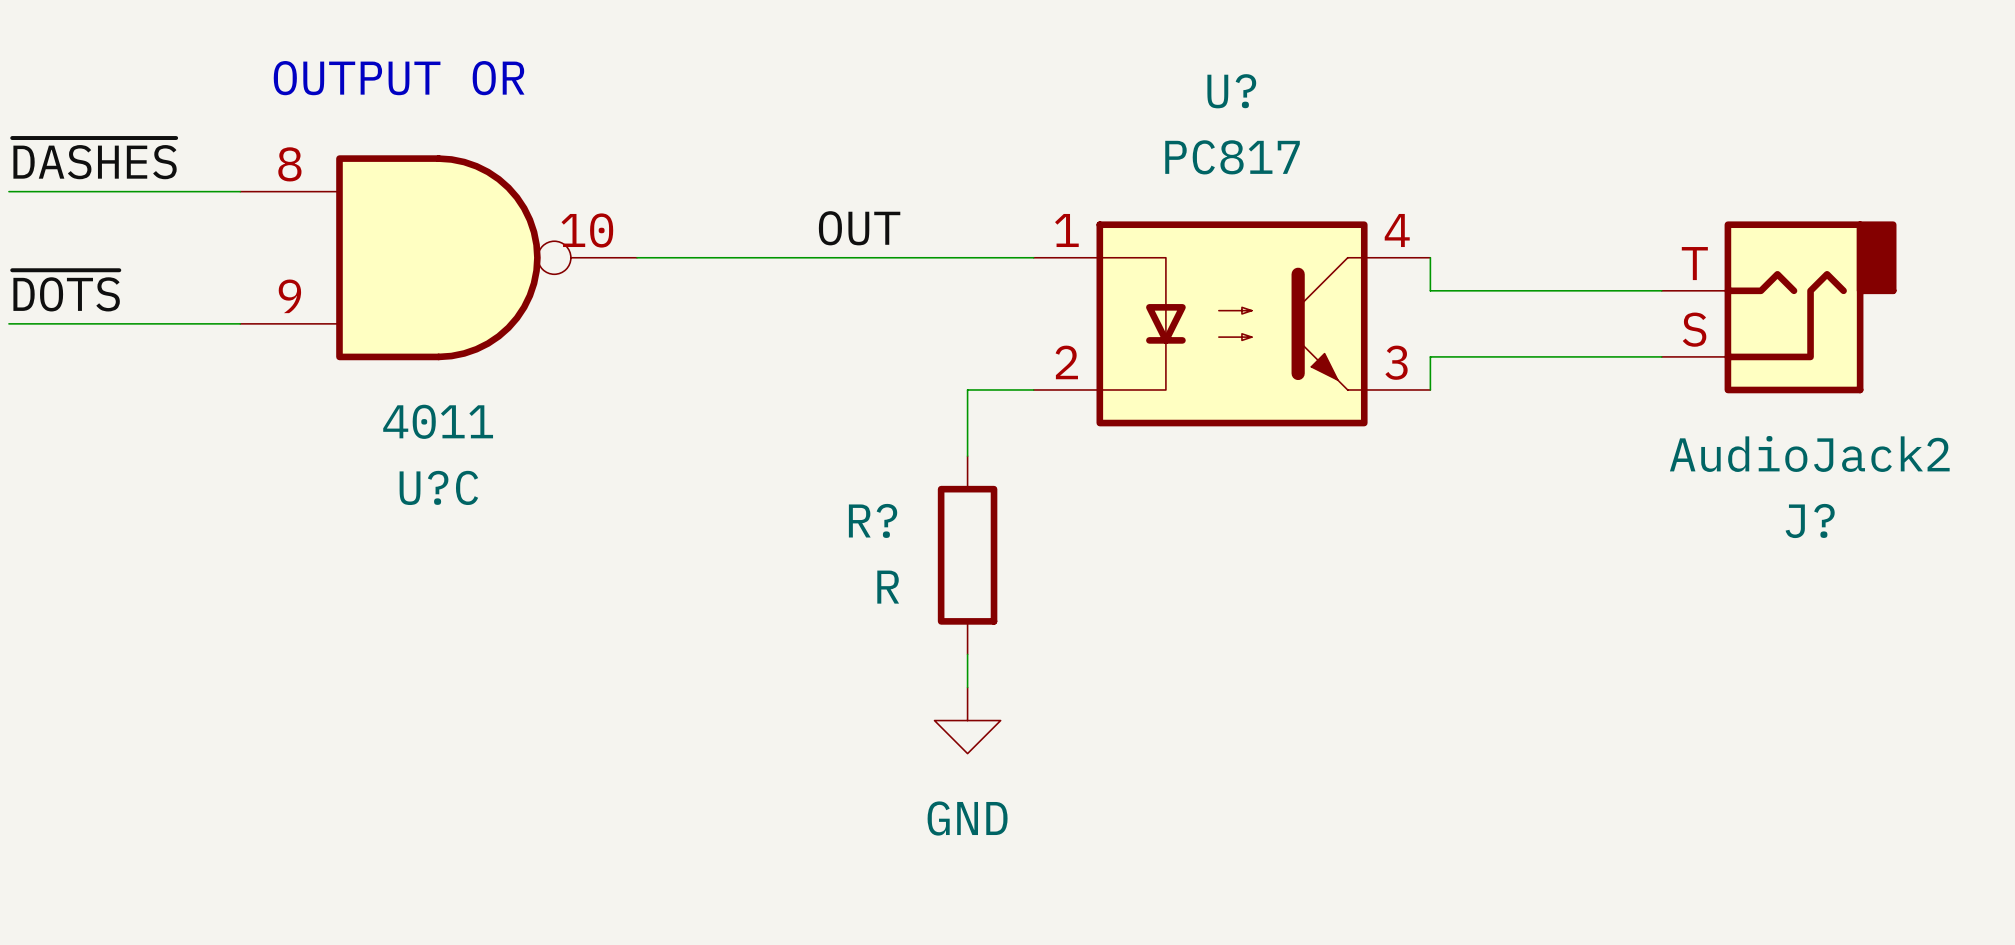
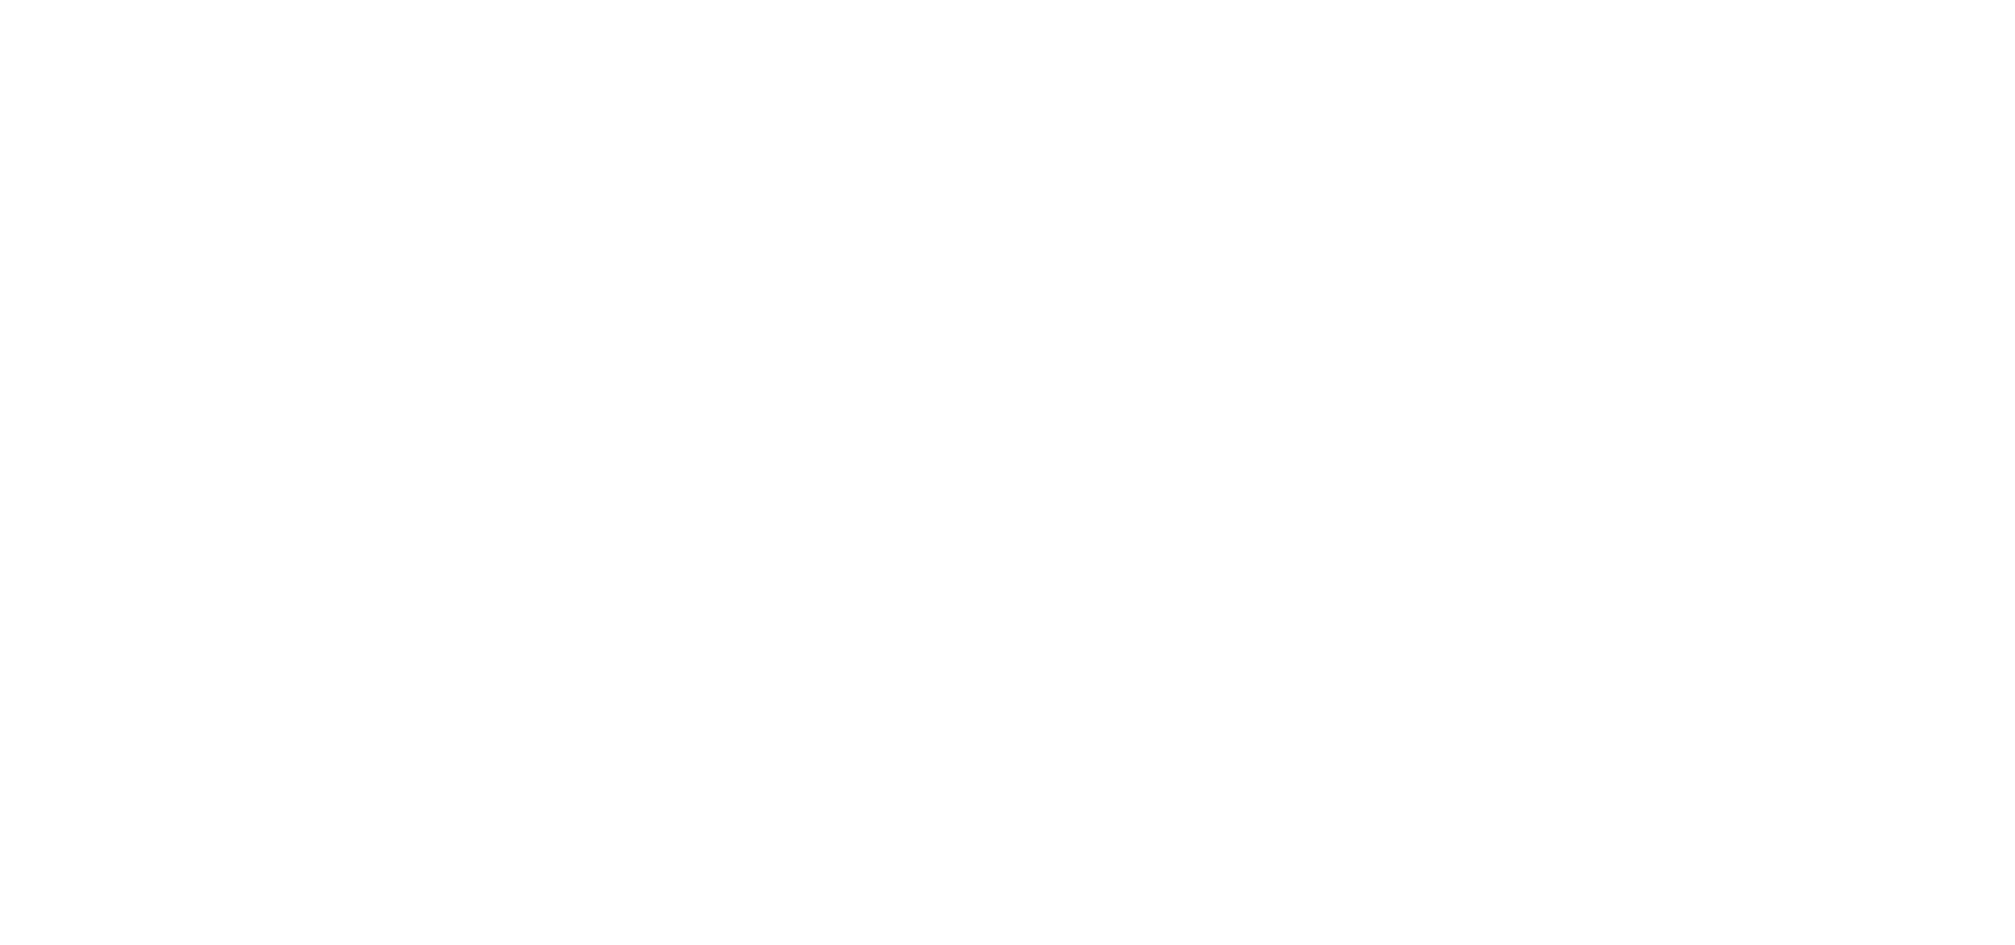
text: OUTPUT OR (399, 78) -> none
label: ~{DASHES} (94, 158) -> none
wire: (8, 191) (240, 191) -> none
label: OUT (859, 228) -> none
U?C: 4011 (438, 257) -> none
wire: (637, 257) (1033, 257) -> none
wire: (1430, 257) (1430, 290) (1661, 290) -> none
label: ~{DOTS} (66, 290) -> none
J?: AudioJack2 (1779, 307) -> none
wire: (8, 323) (240, 323) -> none
U?: PC817 (1232, 323) -> none
wire: (1661, 356) (1430, 356) (1430, 389) -> none
wire: (1033, 389) (967, 389) (967, 456) -> none
R?: R (967, 555) -> none
wire: (967, 654) (967, 687) -> none
power symbol: GND (967, 720) -> none

